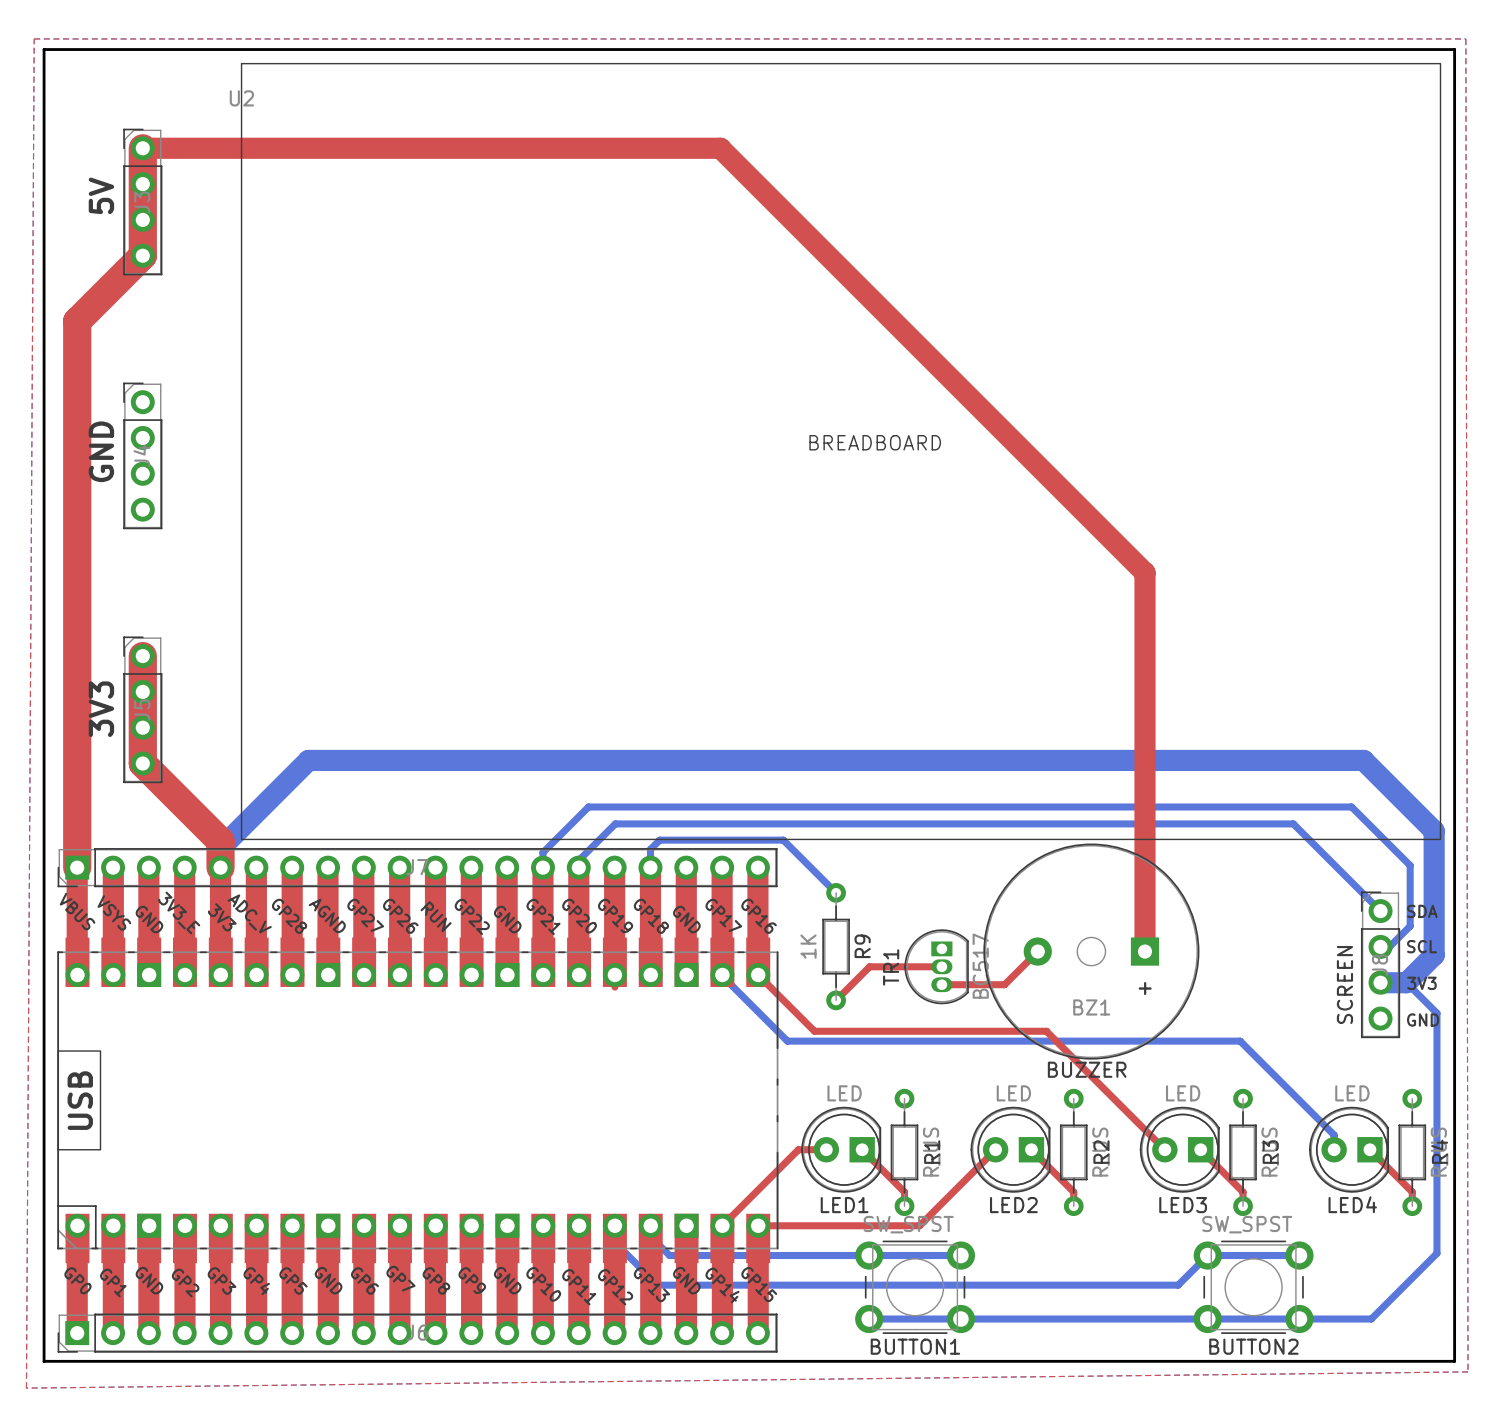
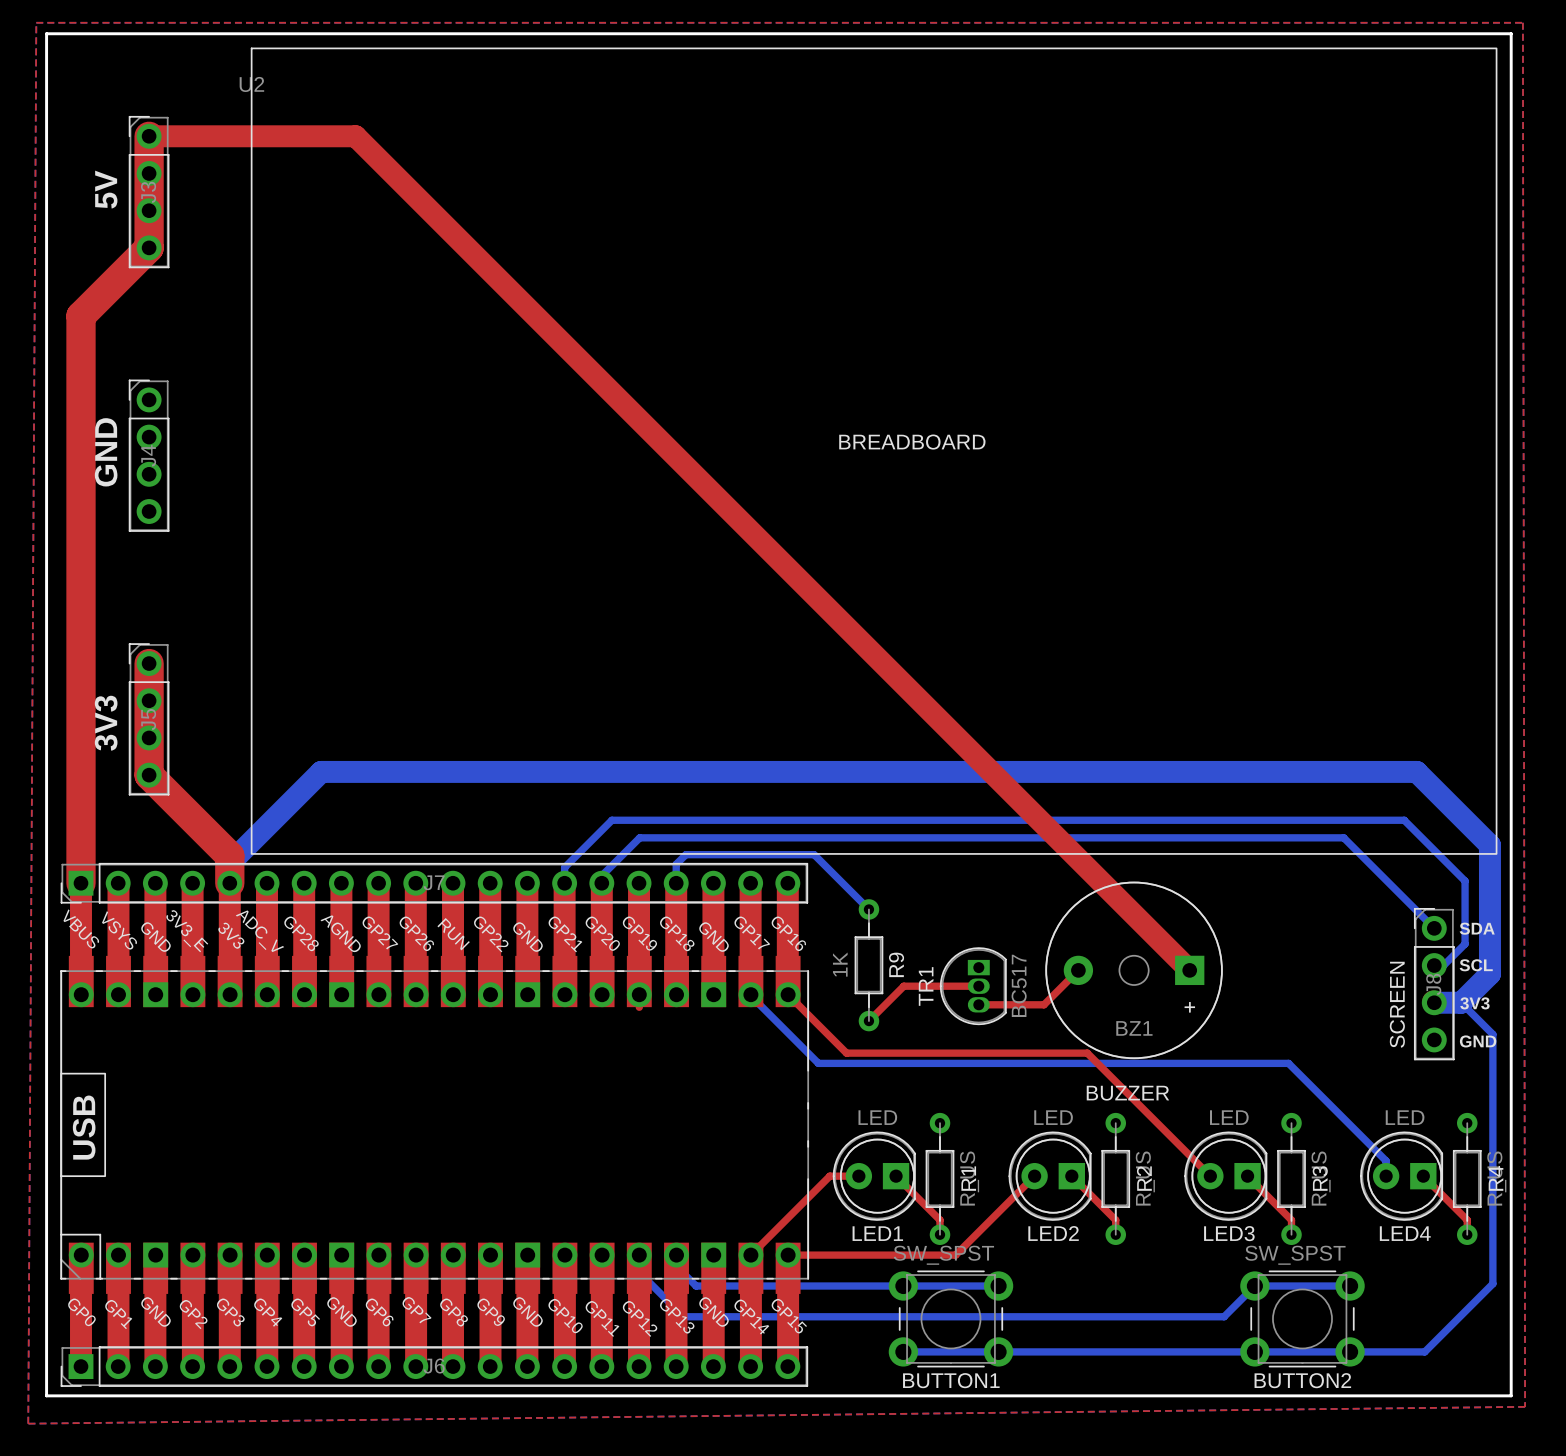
top track: (341, 148) (720, 148) (1144, 572) (1144, 951) -> (355, 136) (1189, 970)
BZ1 footprint: [983, 843, 1200, 1060] -> [1045, 881, 1223, 1060]

